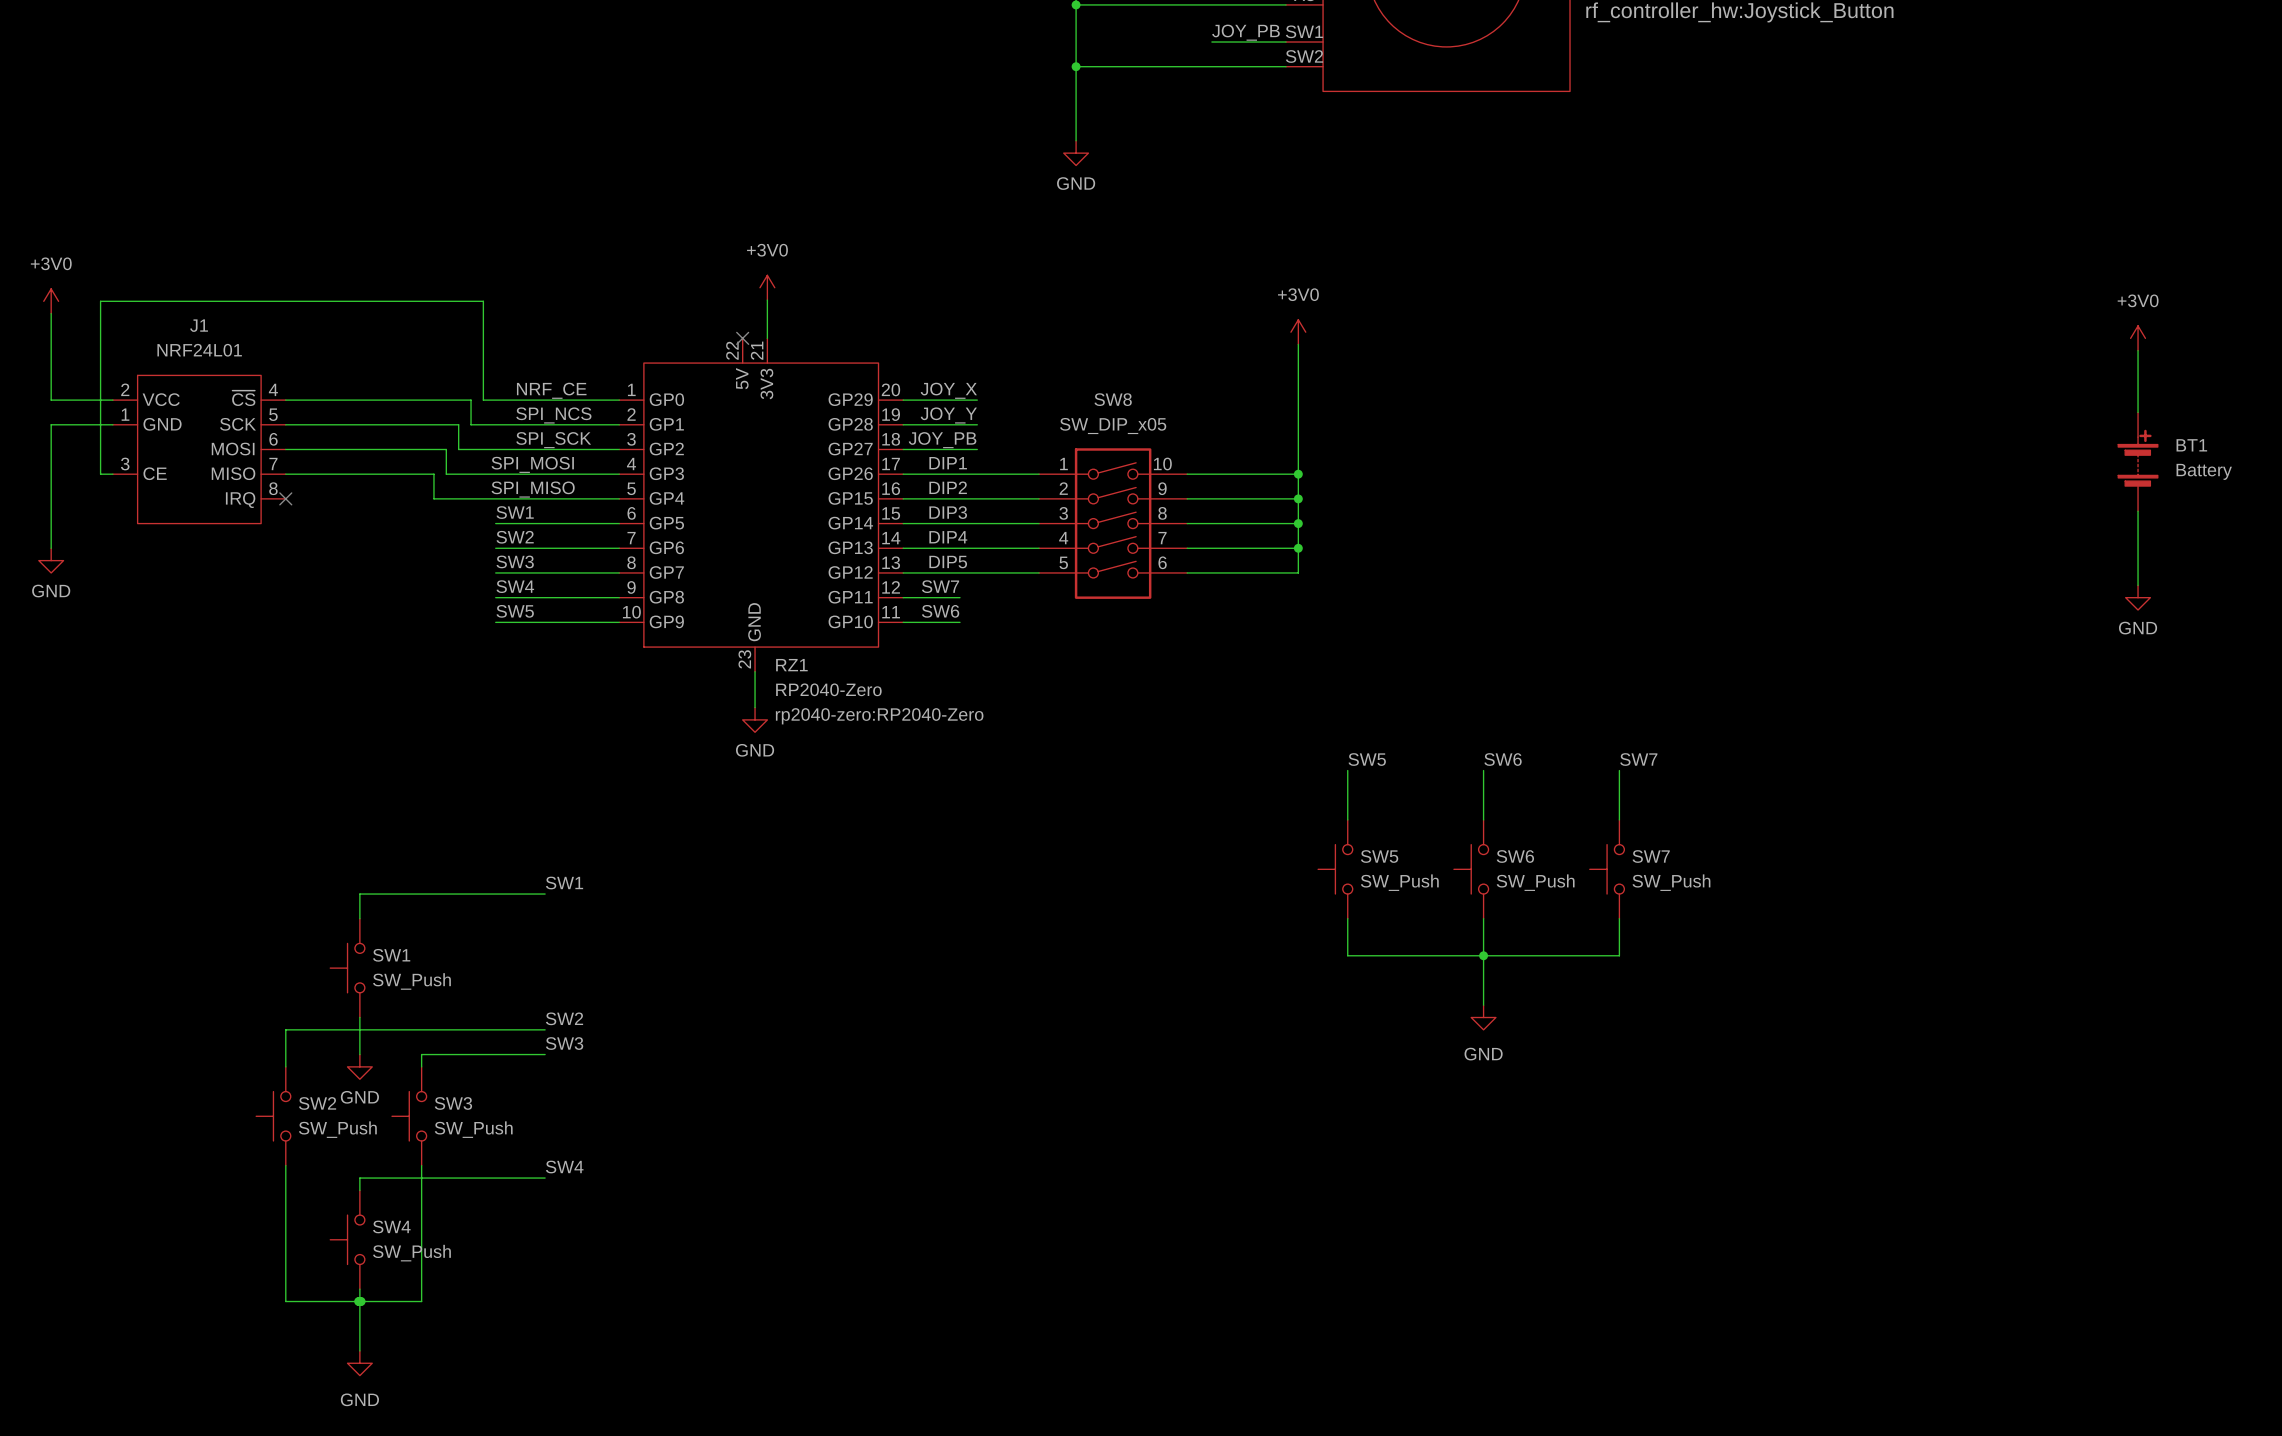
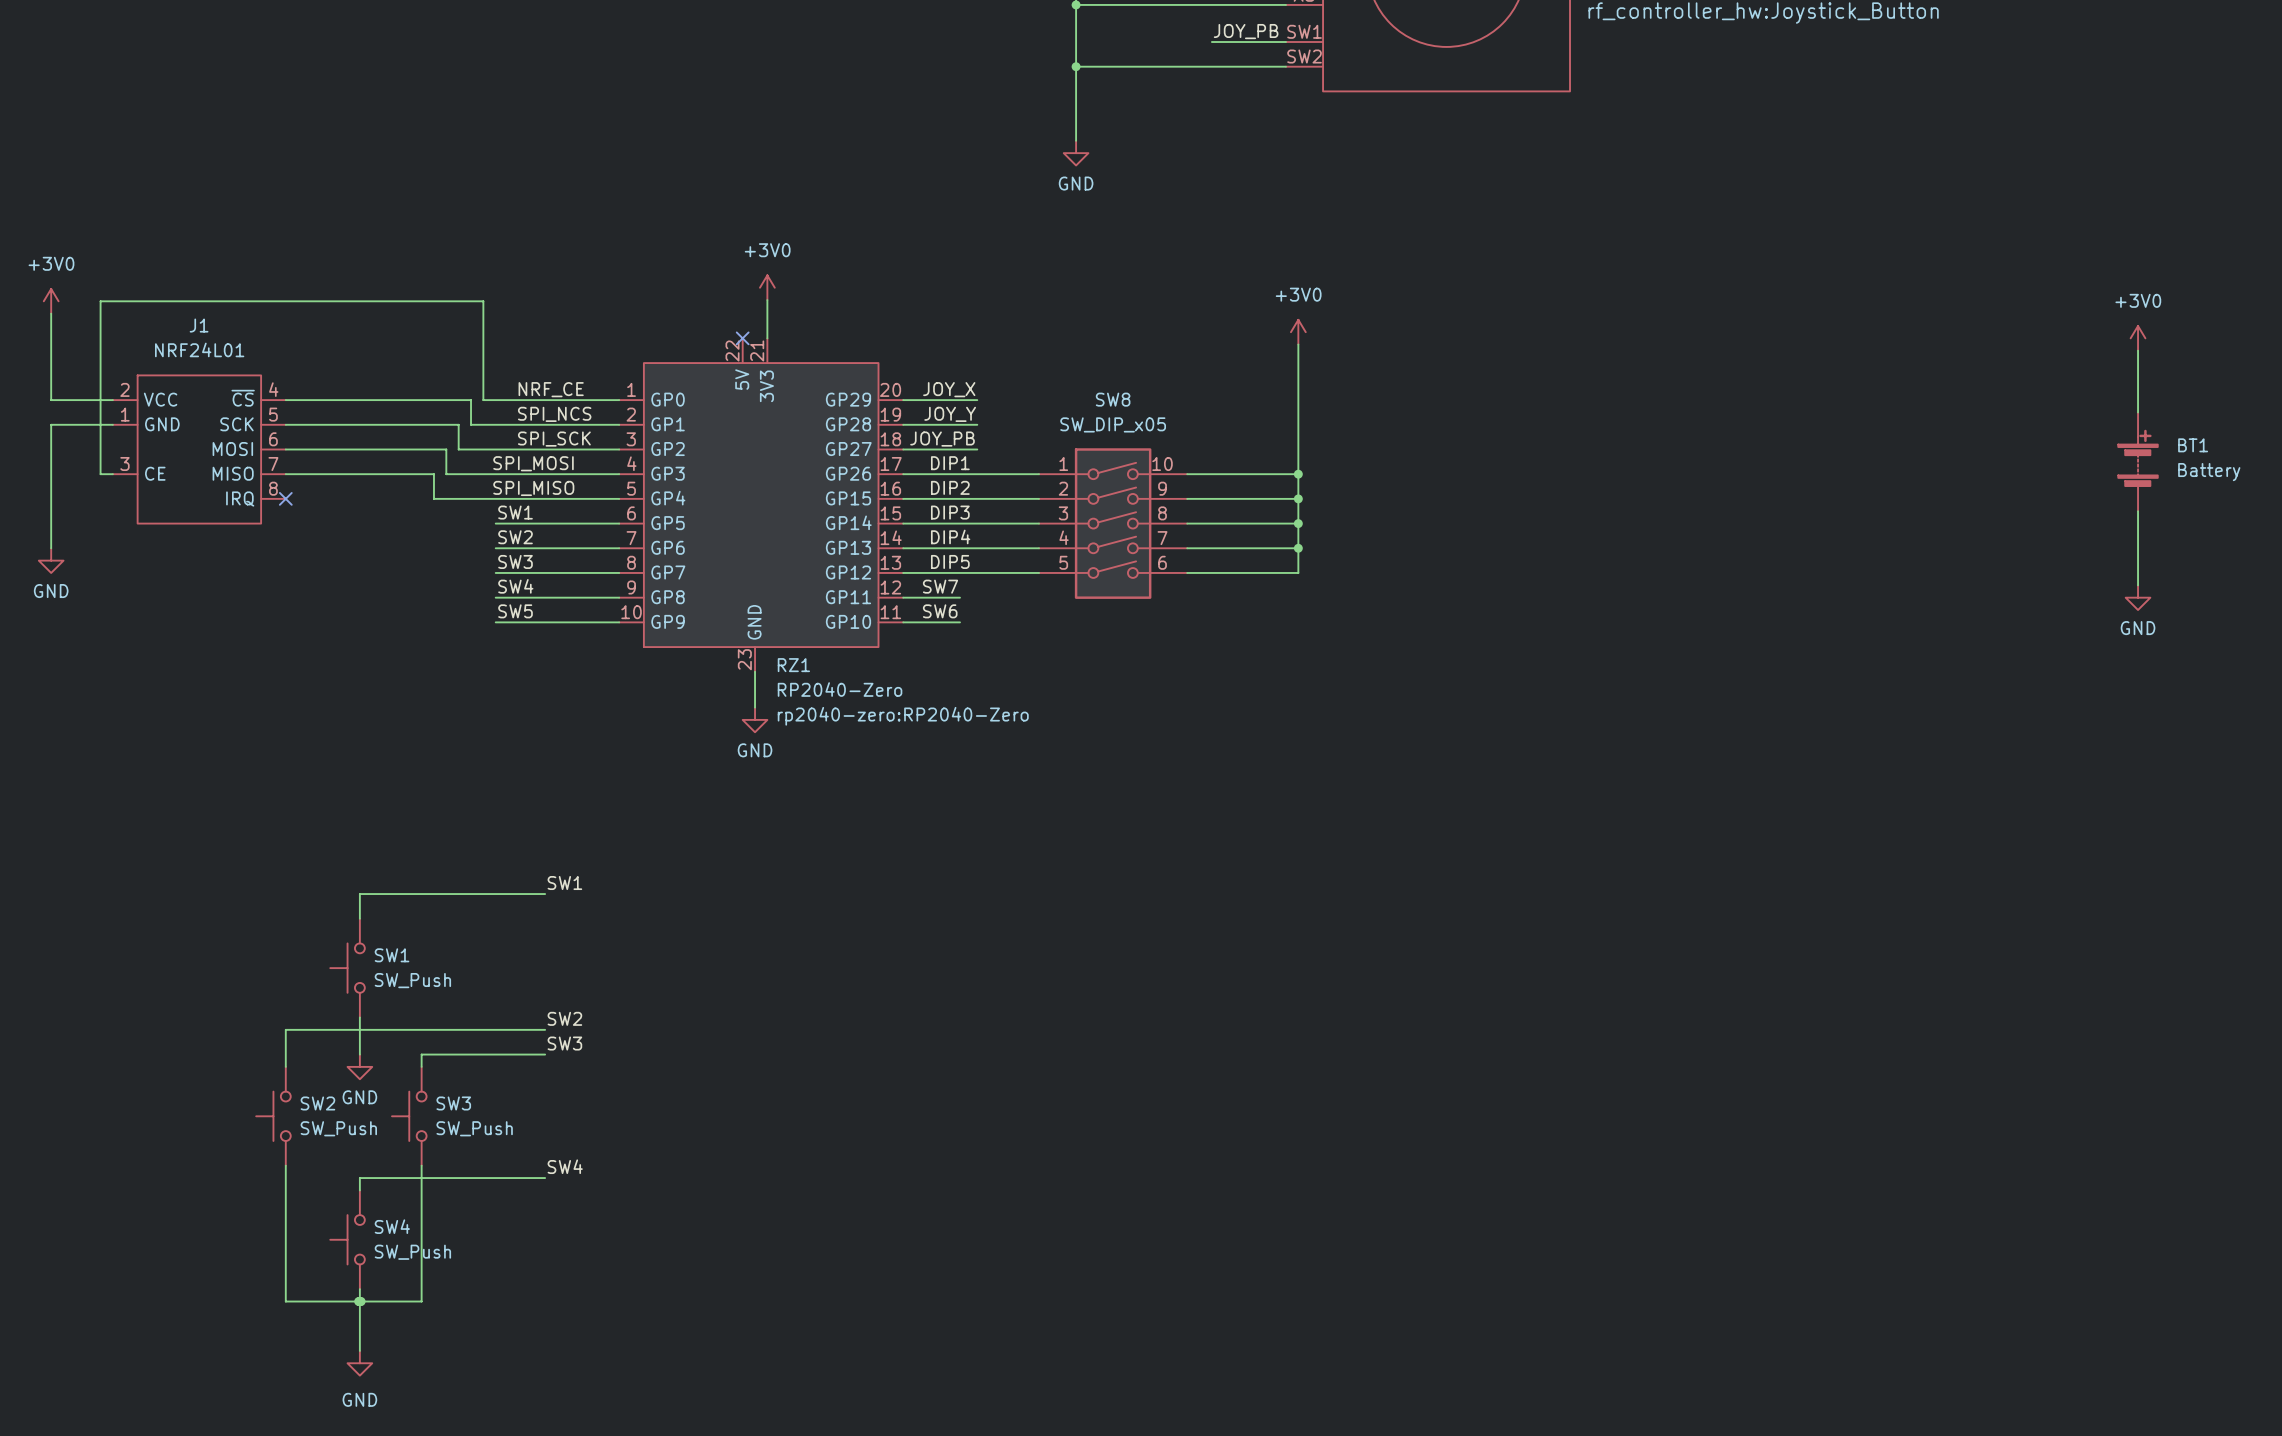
label: SW5 (1367, 759) -> none
label: SW6 (1503, 759) -> none
label: SW7 (1638, 759) -> none
wire: (1347, 770) (1347, 819) -> none
wire: (1483, 770) (1483, 819) -> none
wire: (1619, 770) (1619, 819) -> none
SW5: SW_Push (1335, 869) -> none
SW6: SW_Push (1471, 869) -> none
SW7: SW_Push (1607, 869) -> none
wire: (1347, 918) (1347, 955) (1619, 955) (1619, 918) -> none
wire: (1483, 918) (1483, 1005) -> none
junction: (1483, 955) -> none
power symbol: GND (1483, 1017) -> none

